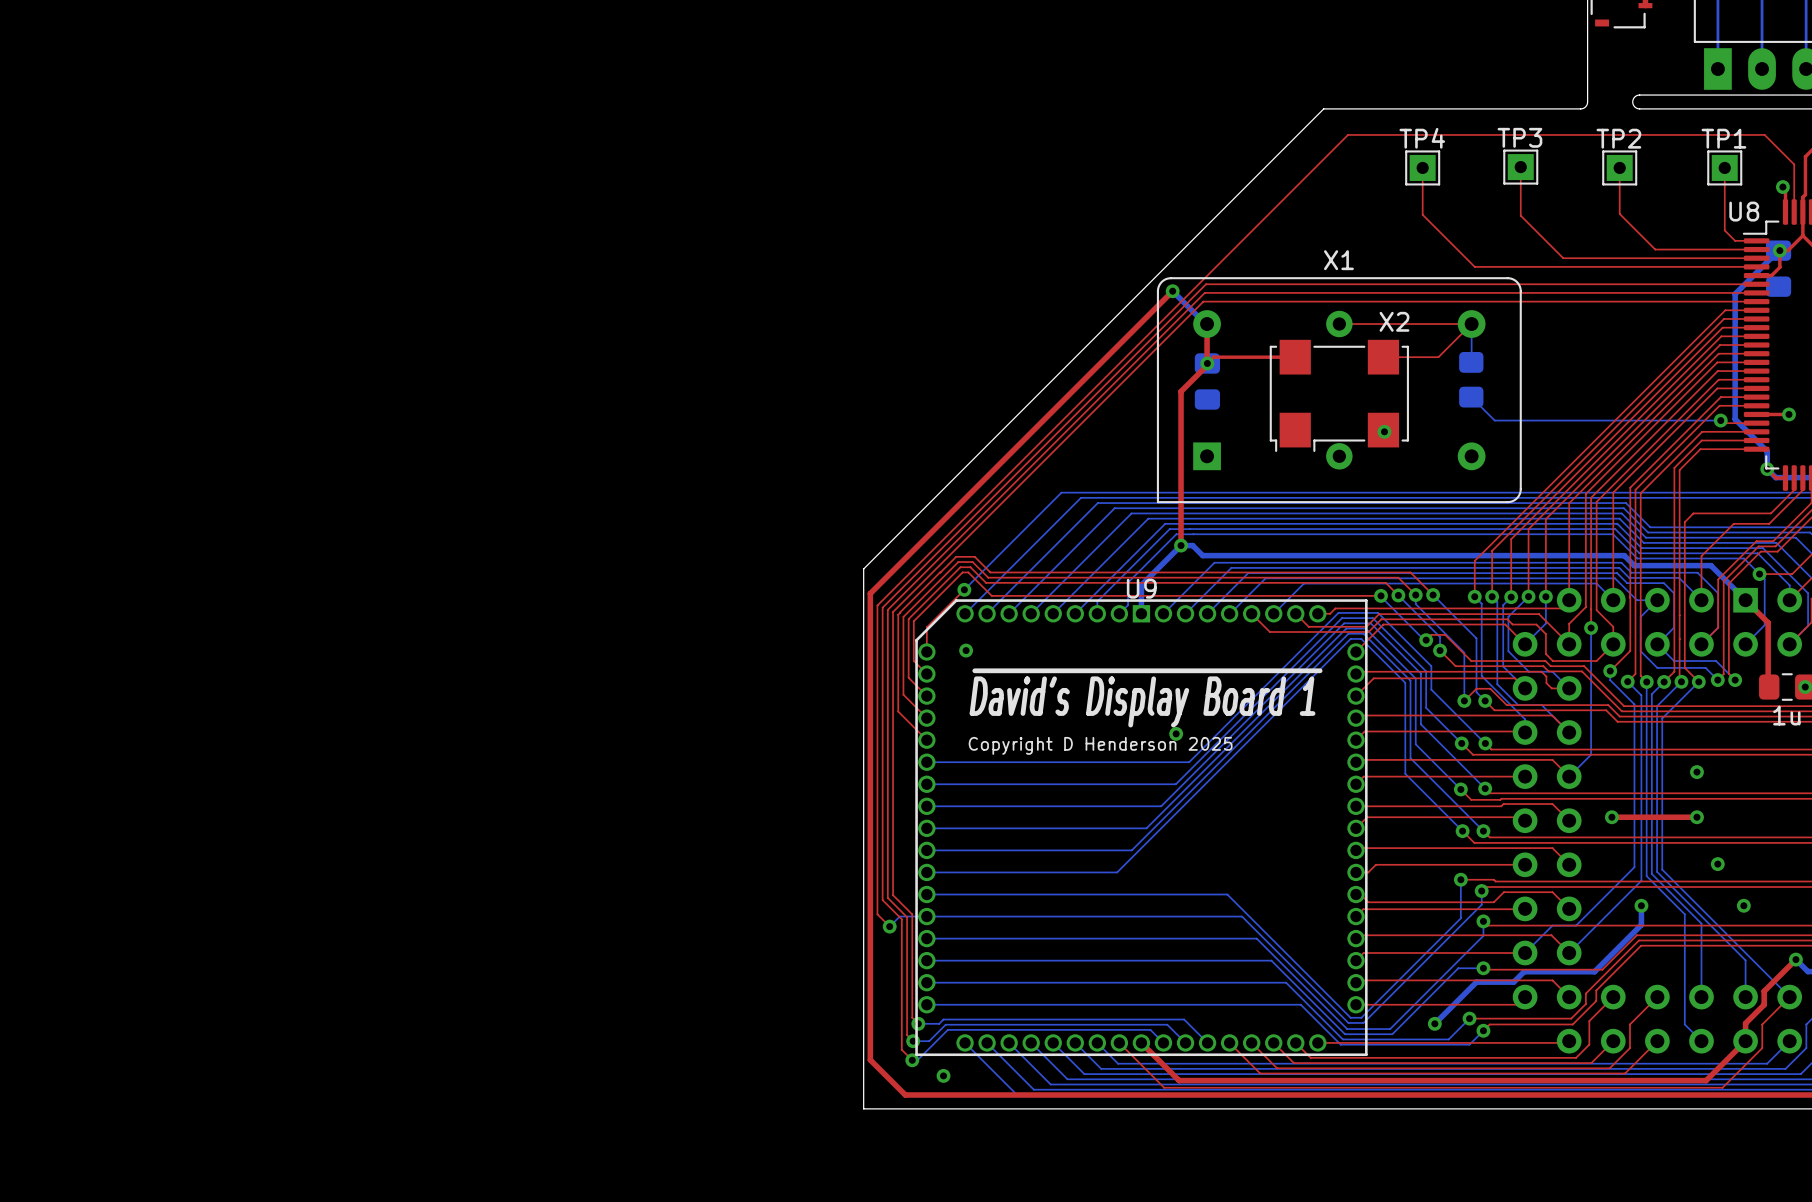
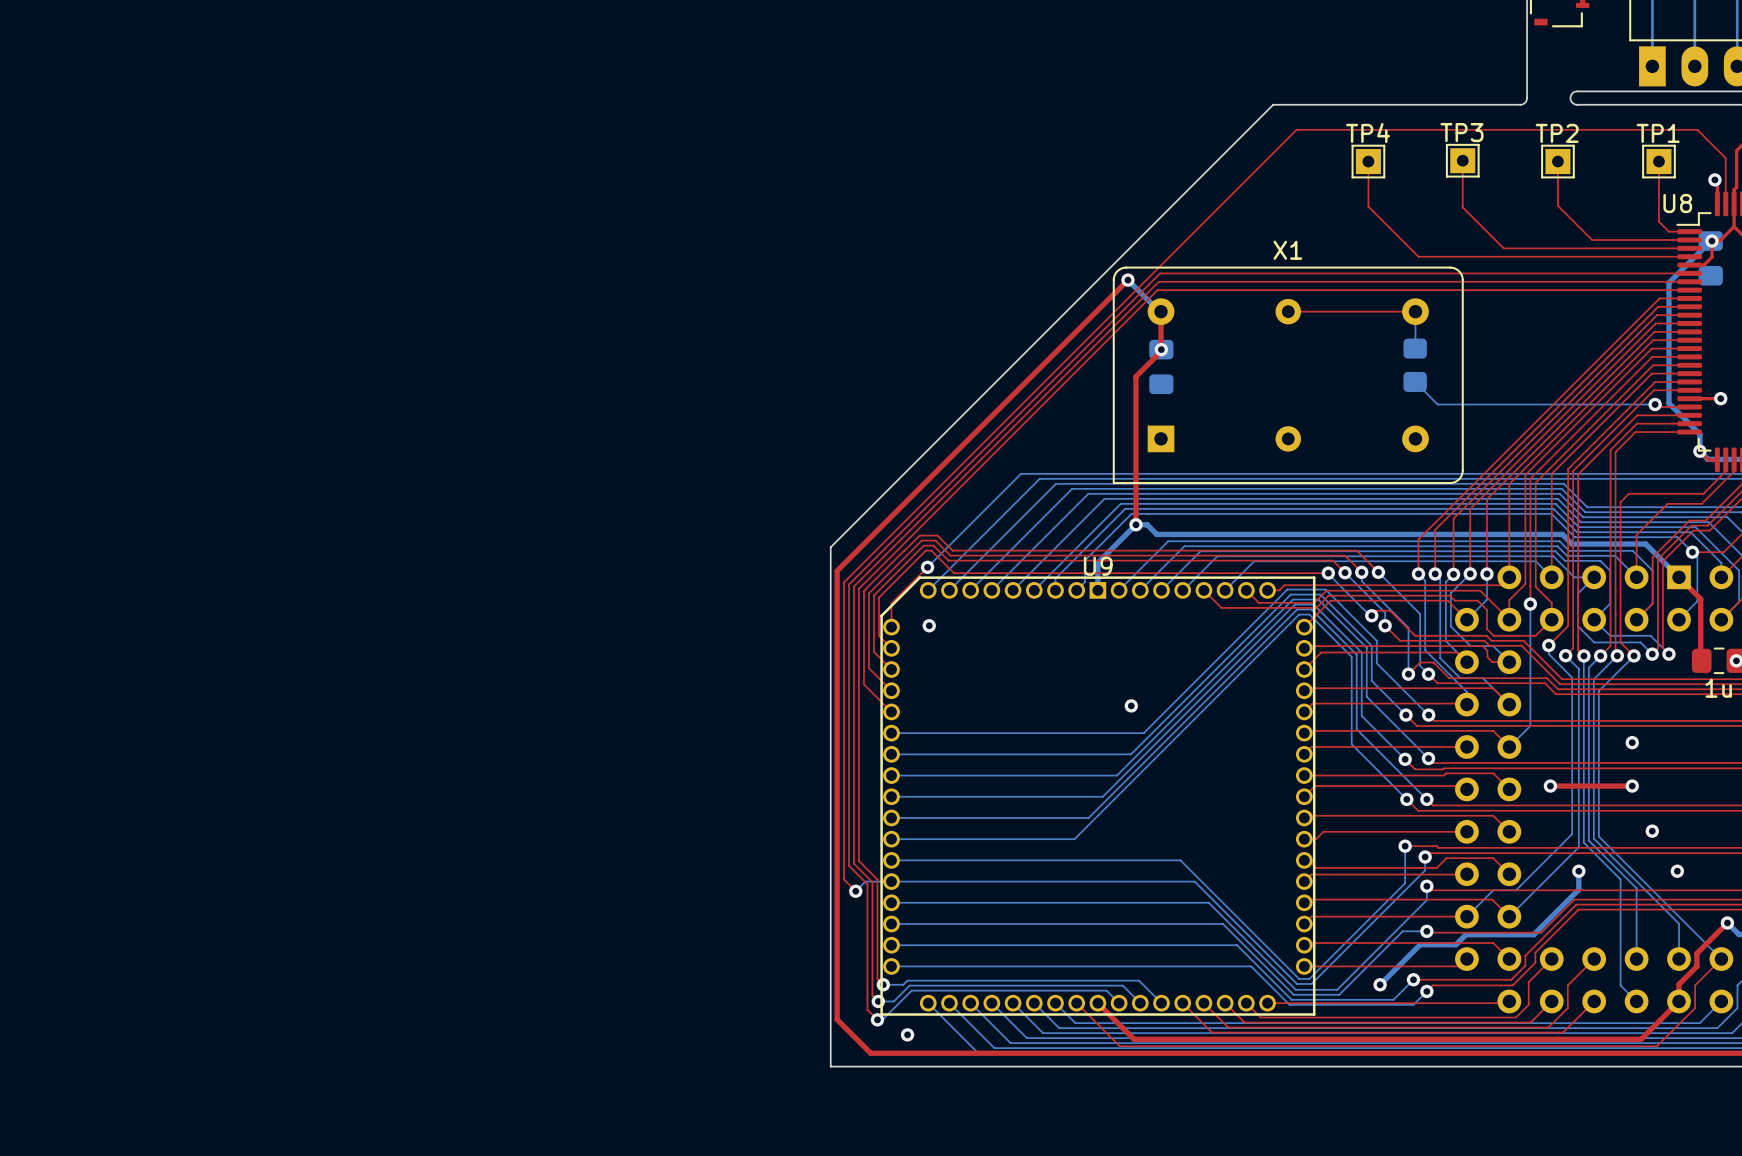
top track: (1471, 324) (1438, 357) (1383, 357) -> none
top track: (1295, 357) (1213, 357) (1207, 363) -> none
X2: (1339, 395) -> none
via: (1384, 431) -> none
text: ~{David's Display Board 1} (1146, 697) -> none
text: Copyright D Henderson 2025 (1100, 745) -> none

